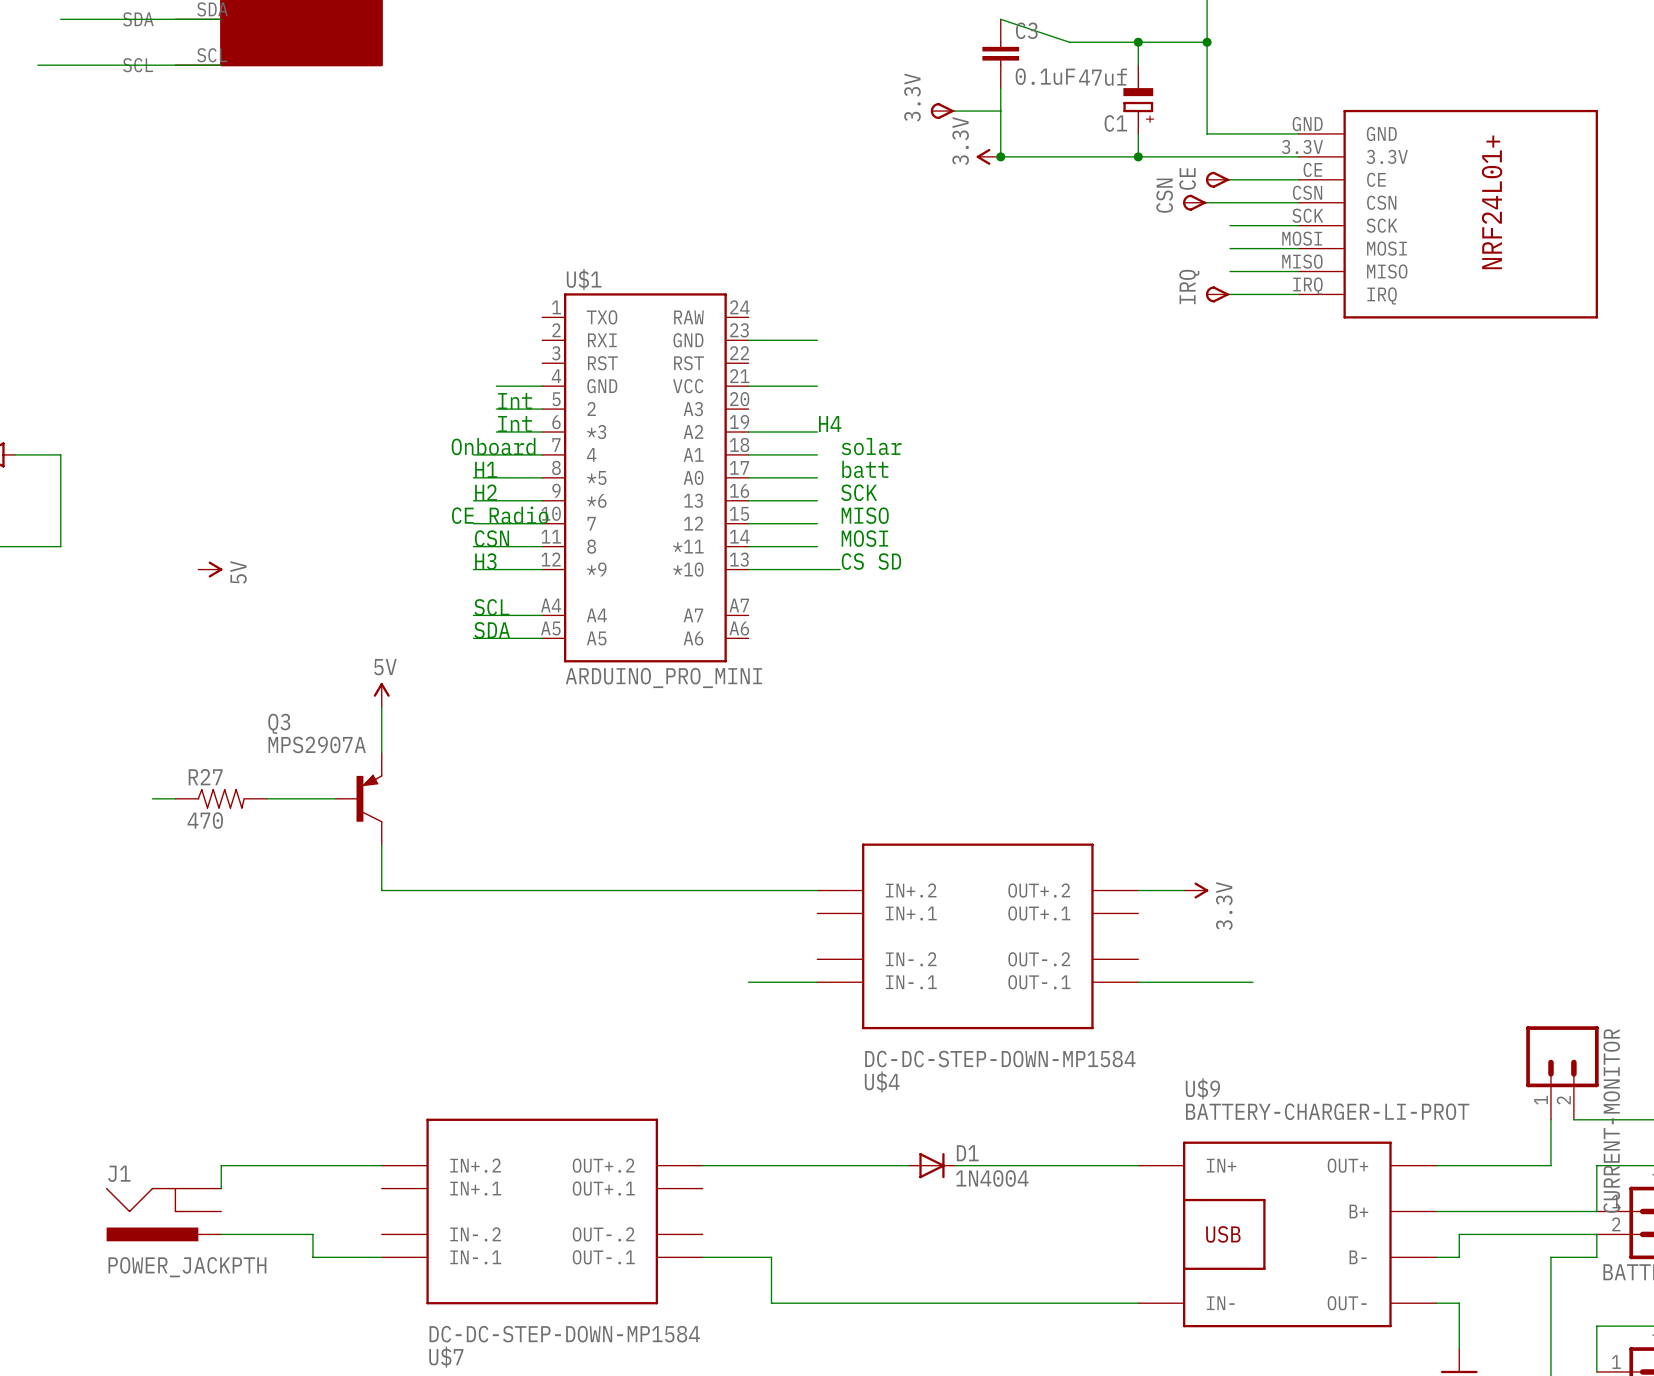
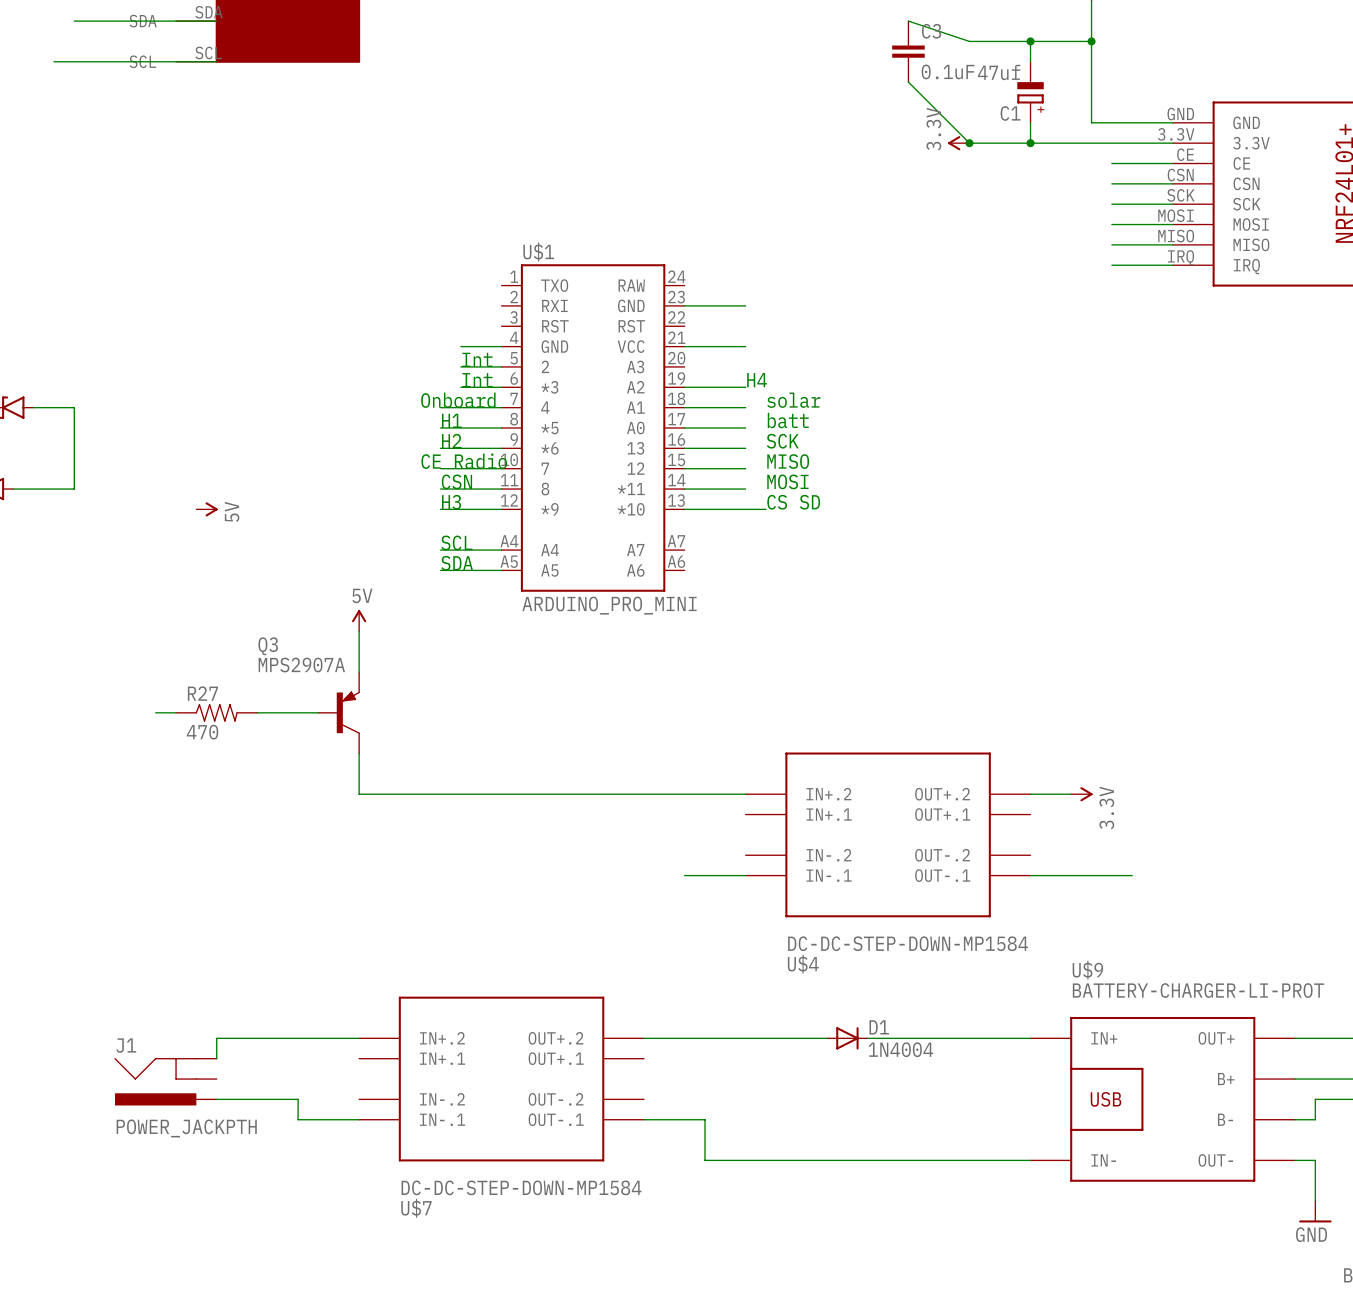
wire: (1000, 88) (1000, 156) (1069, 156) -> (908, 82) (969, 143)
3.3V: (942, 111) -> none
wire: (954, 111) (1000, 111) -> none
power symbol position: 3.3V (988, 156) -> 3.3V (958, 143)
junction: (1000, 156) -> none
junction: none -> (969, 143)
CE: (1217, 179) -> none
CSN: (1195, 202) -> none
wire: (1207, 202) (1230, 202) -> none
IRQ: (1217, 294) -> none

